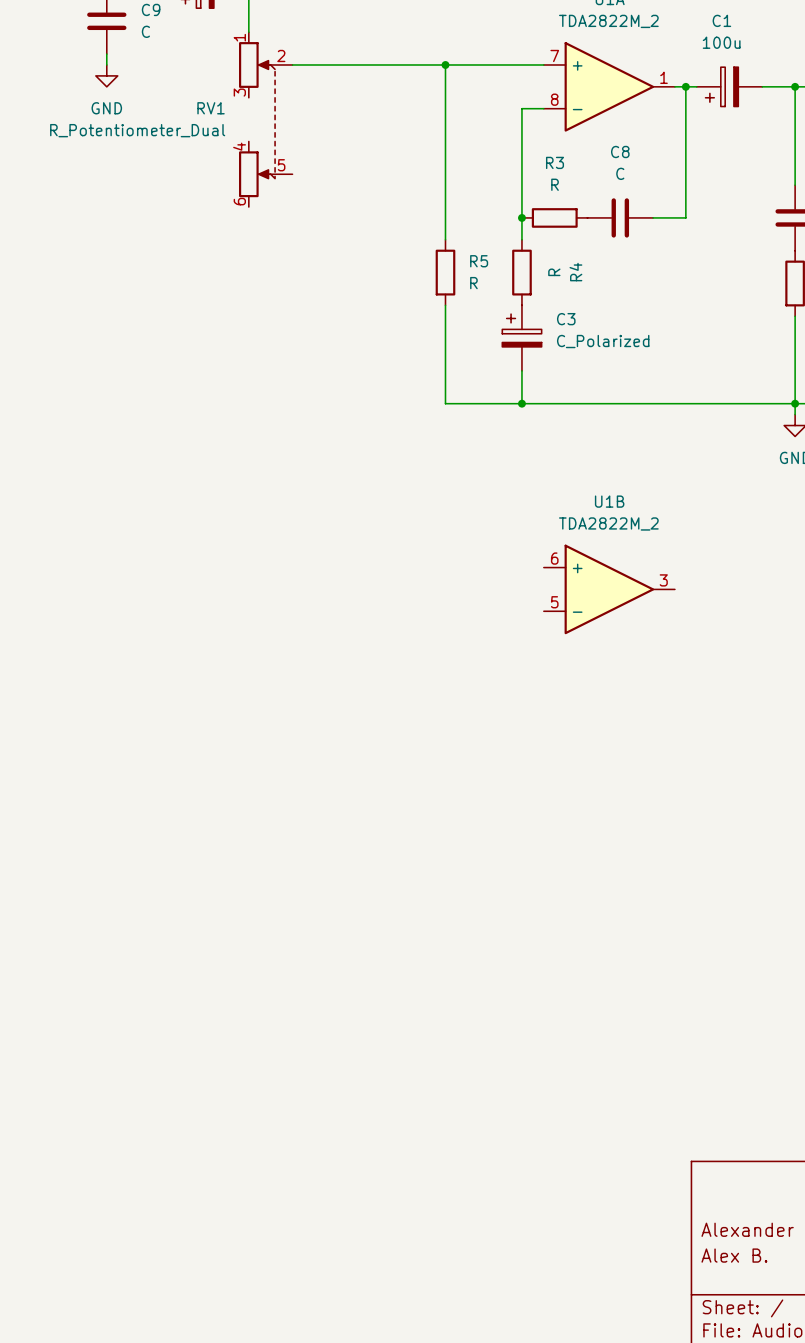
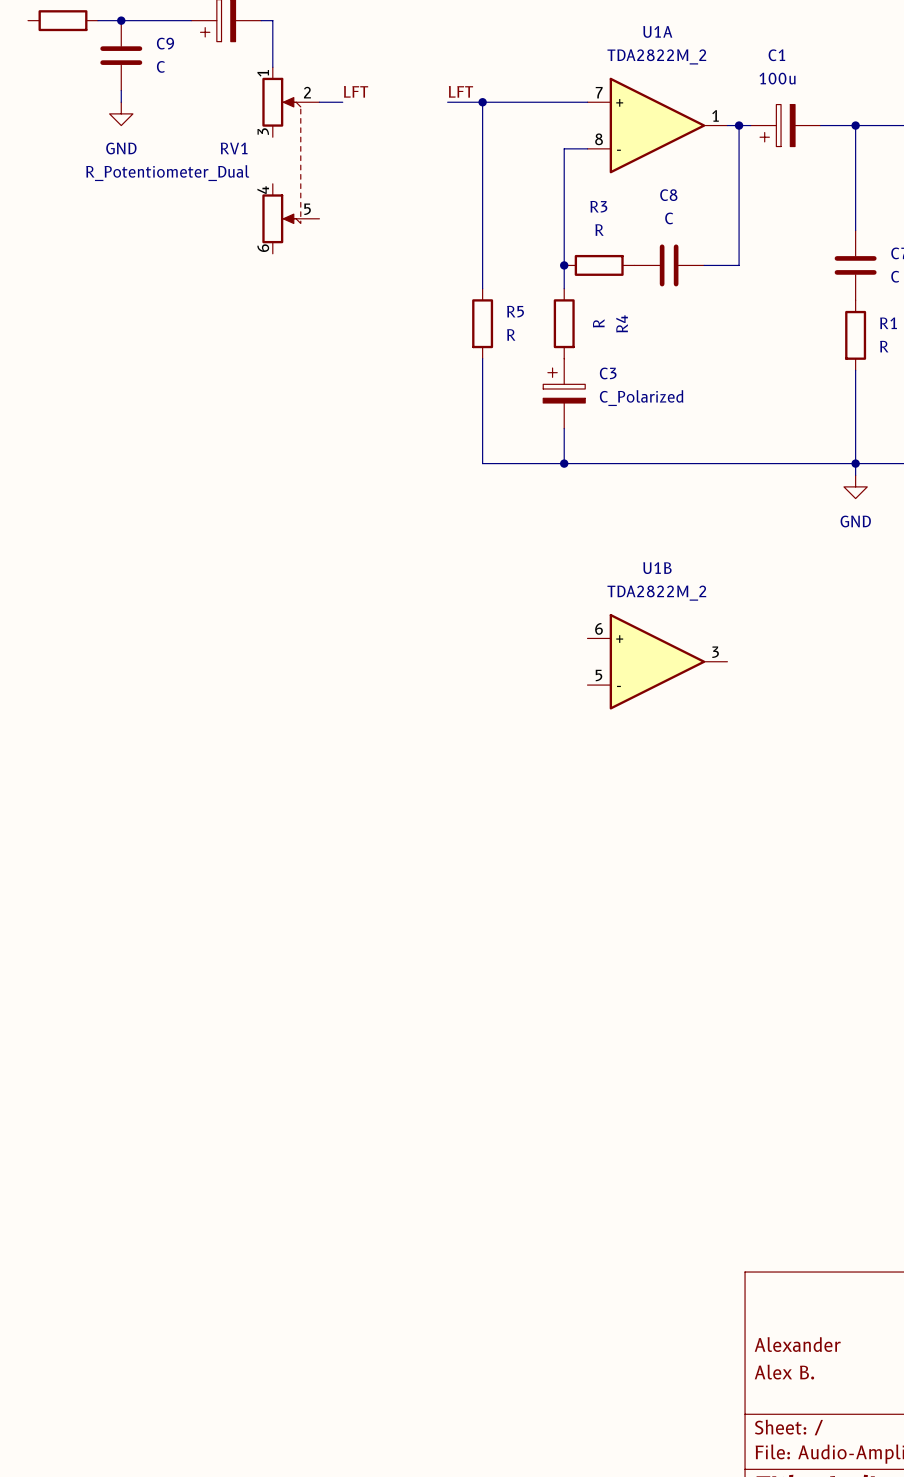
label: none -> LFT (356, 91)
label: none -> LFT (460, 91)
wire: (314, 64) (412, 64) -> none

